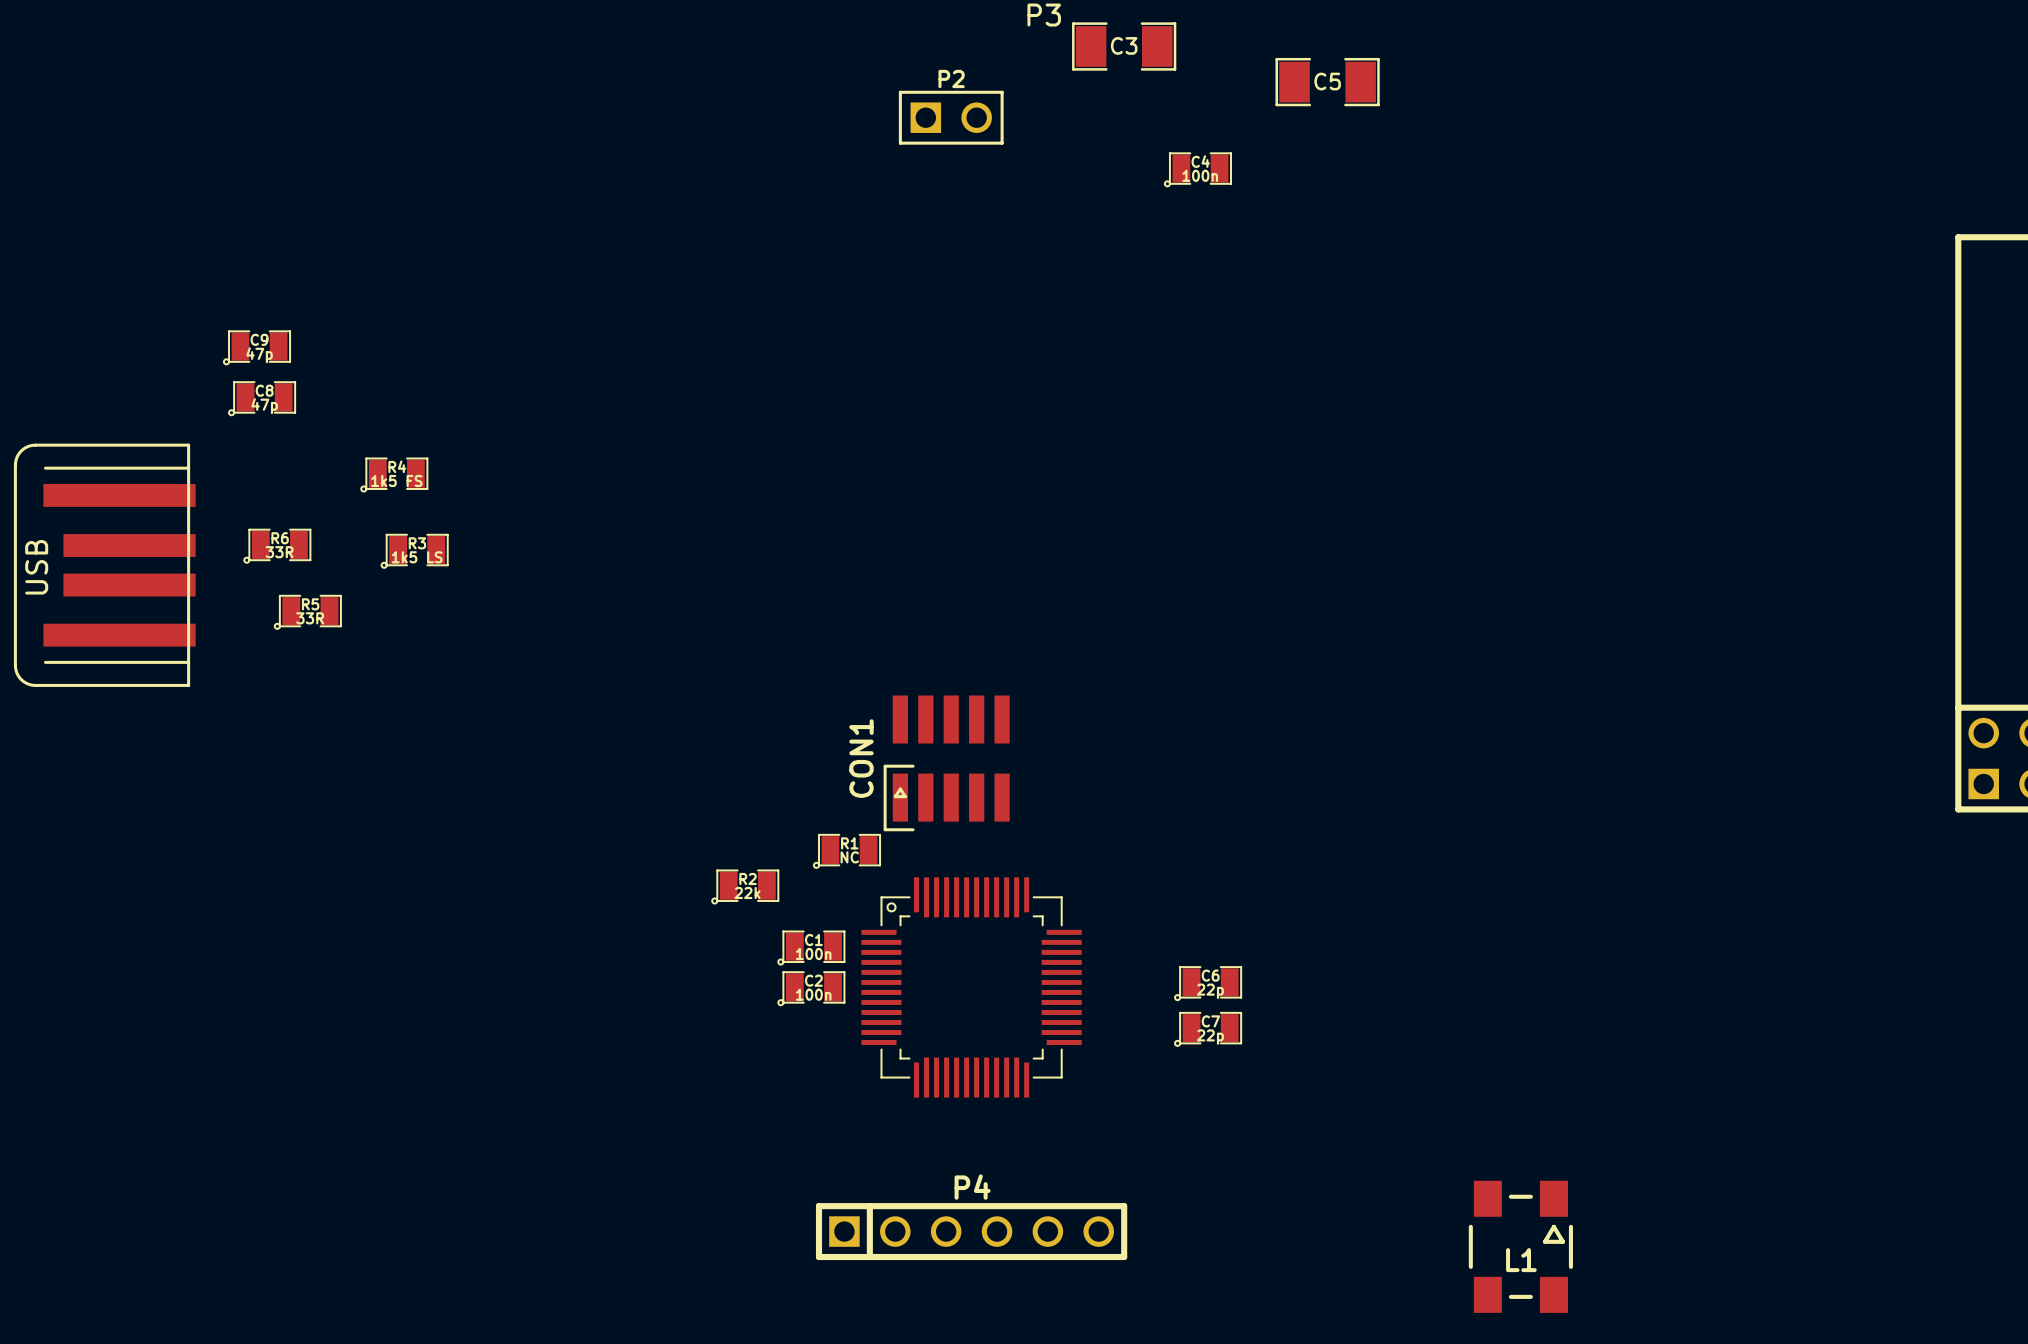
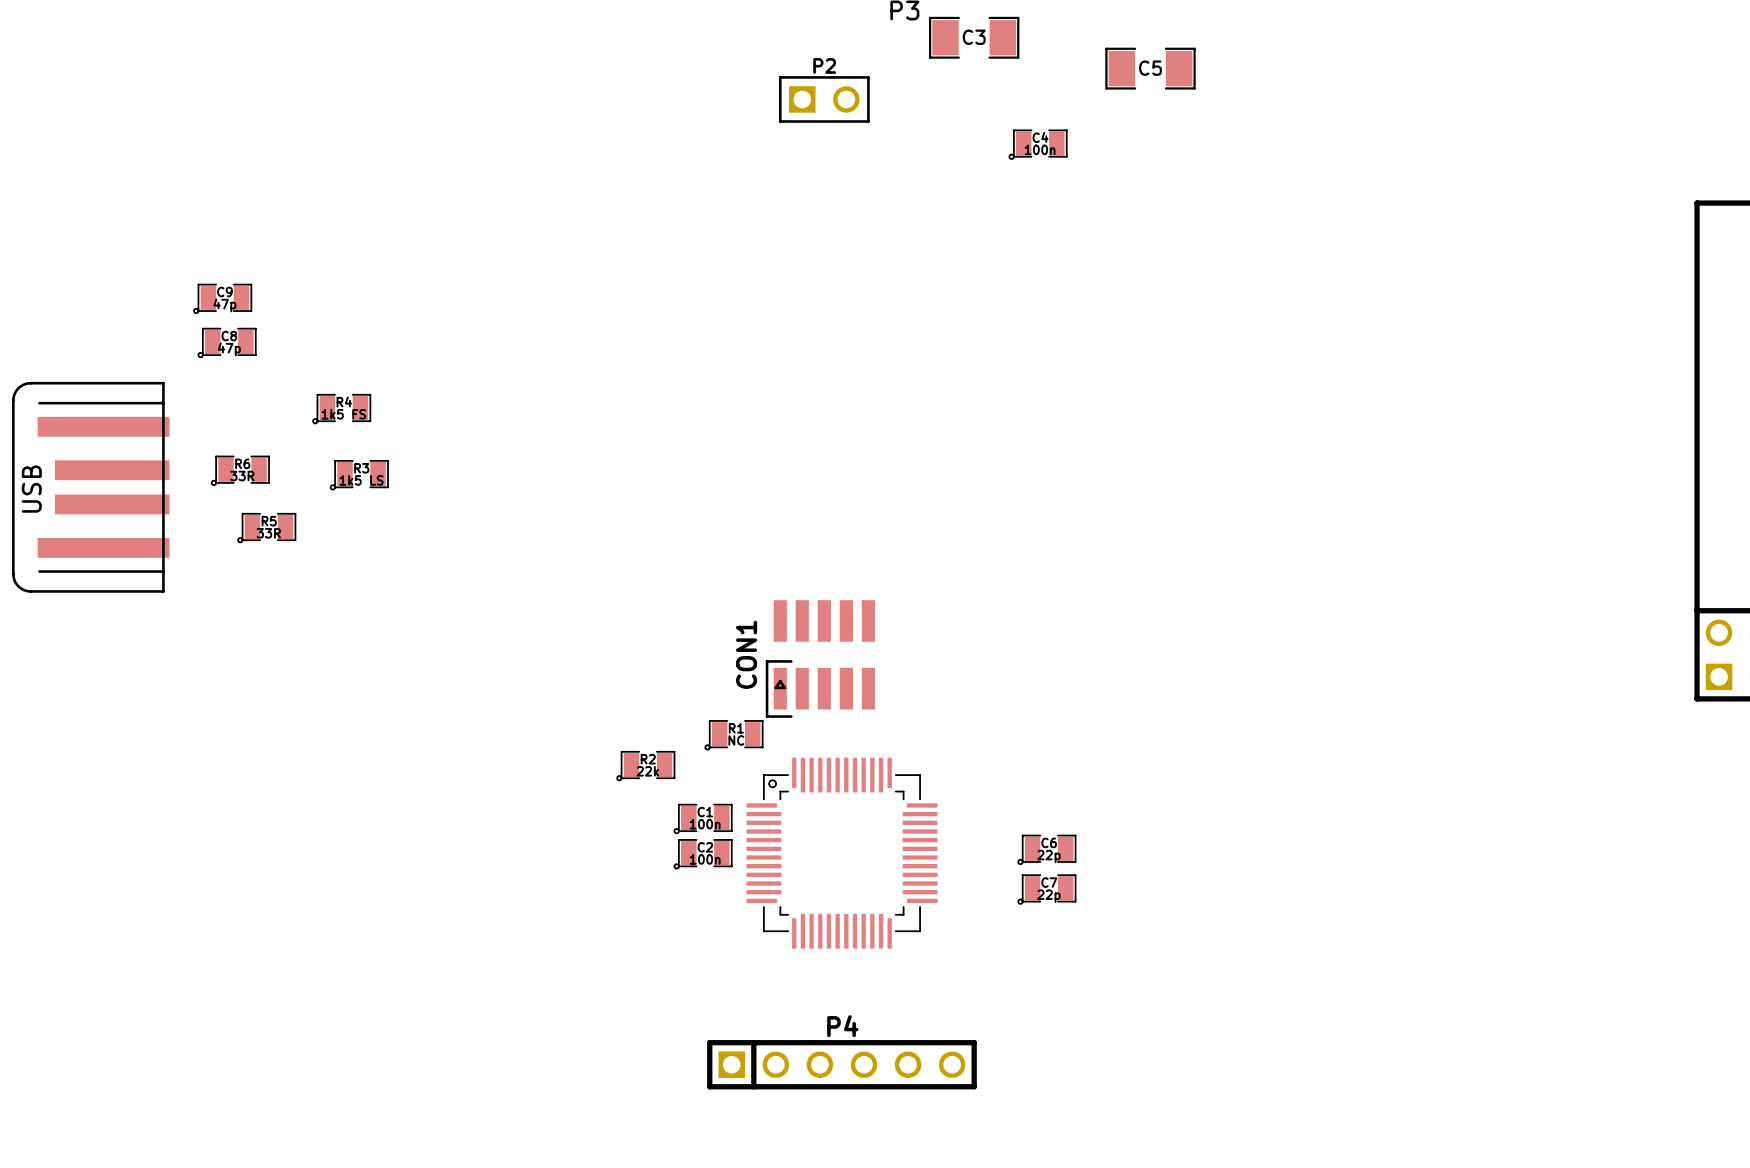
L1: (1520, 1246) -> none

